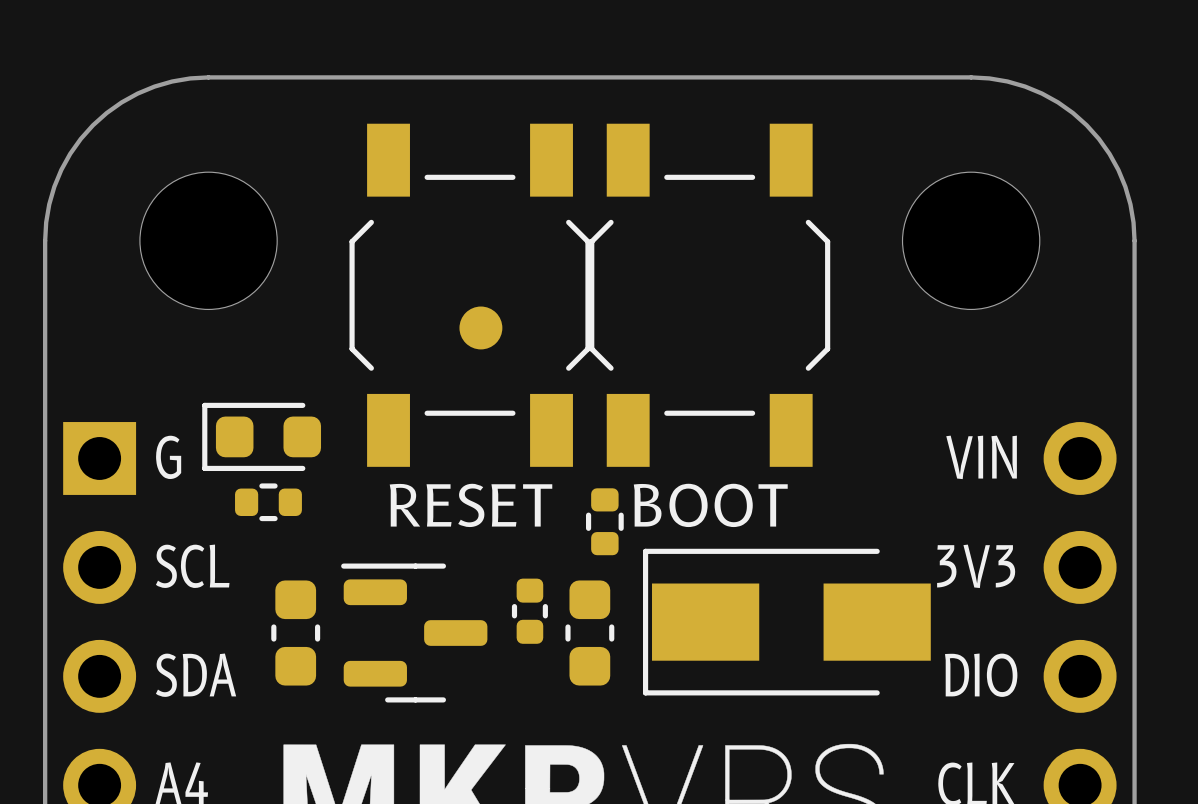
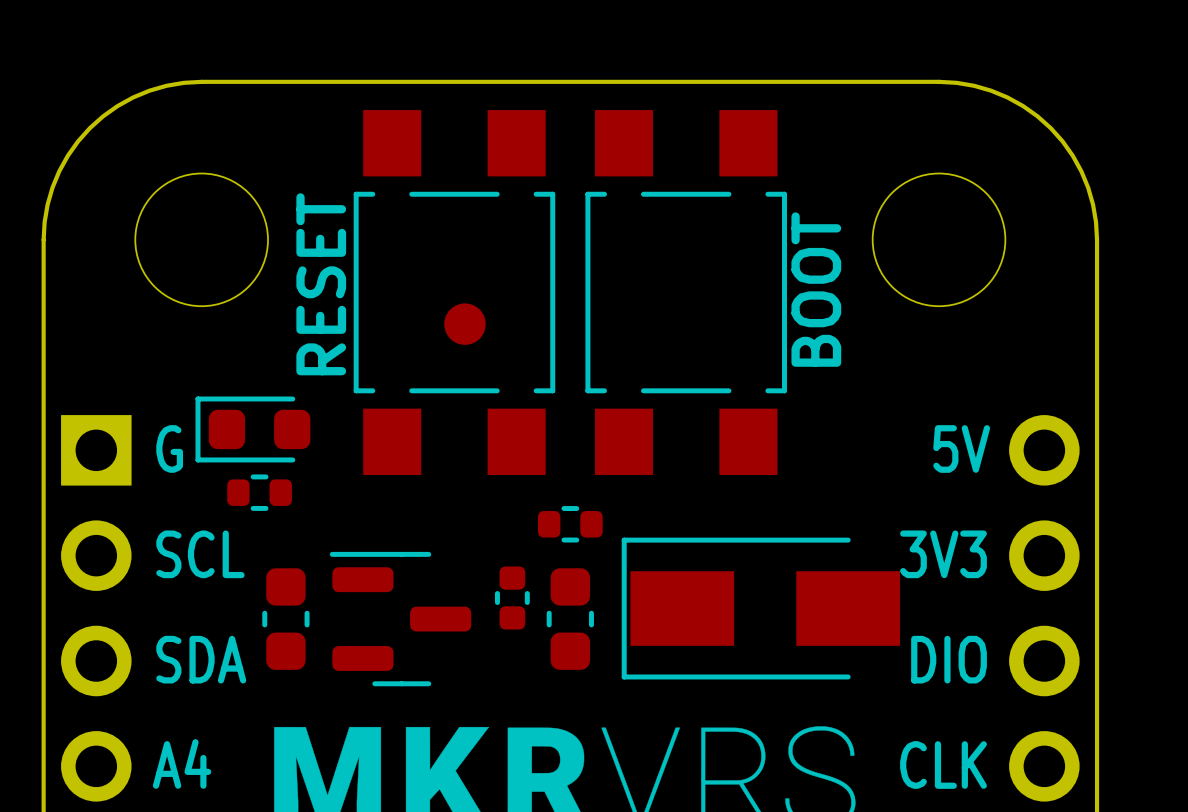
part footprint: [349, 123, 591, 467] -> [353, 110, 556, 476]
part footprint: [589, 123, 831, 467] -> [585, 110, 787, 476]
text: VIN (981, 457) -> 5V (961, 448)
text rotation: 0° (471, 505) -> 90° counterclockwise (321, 284)
text position: RESET (471, 505) -> RESET (321, 284)
text rotation: 0° (710, 505) -> 90° counterclockwise (816, 289)
text position: BOOT (710, 505) -> BOOT (816, 289)
part rotation: 0° (604, 521) -> 90° clockwise (570, 524)

